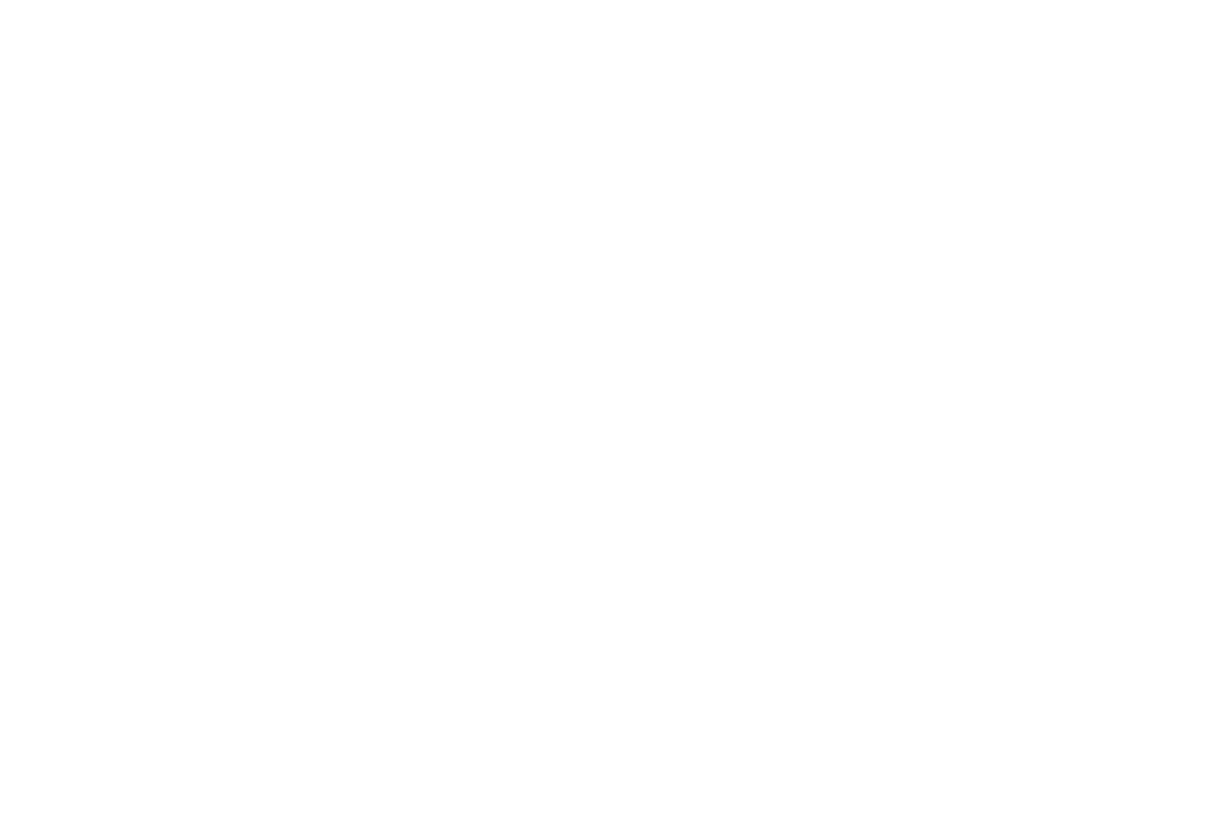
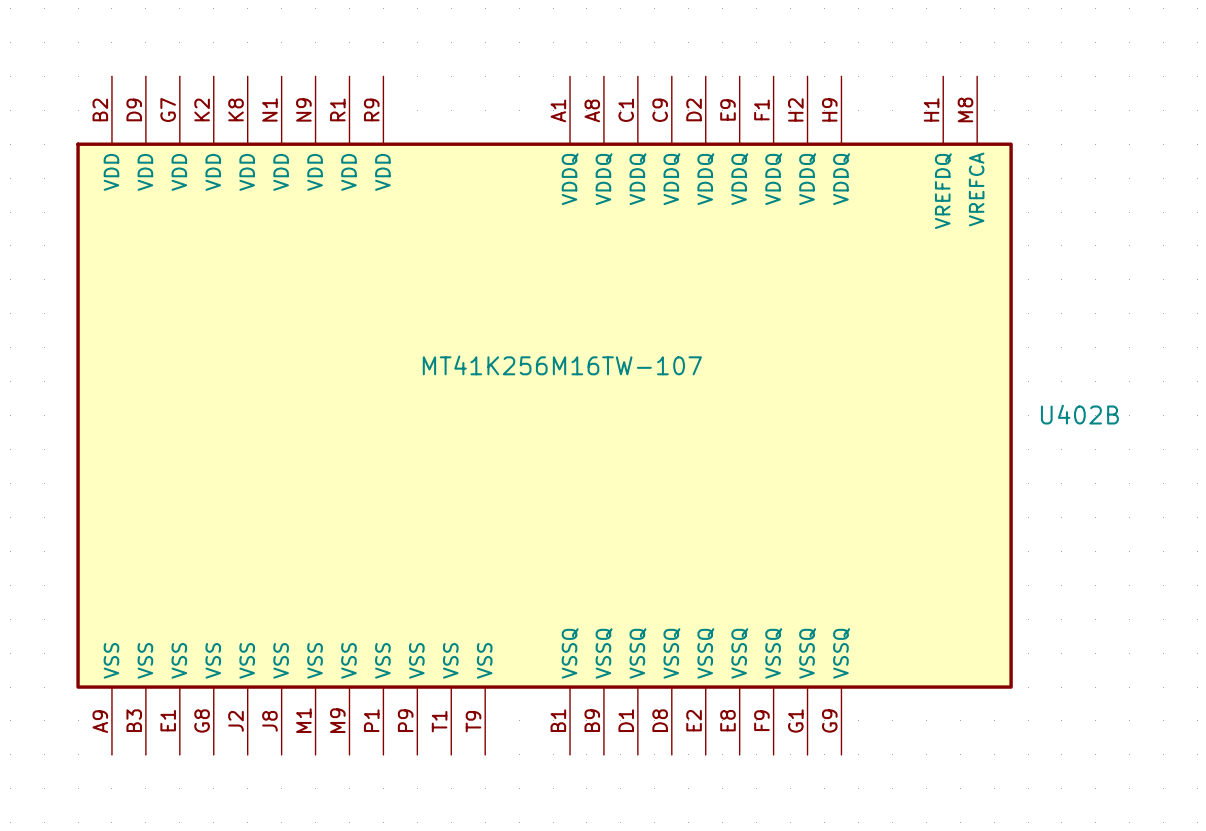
U402B: none -> MT41K256M16TW-107 (544, 415)

